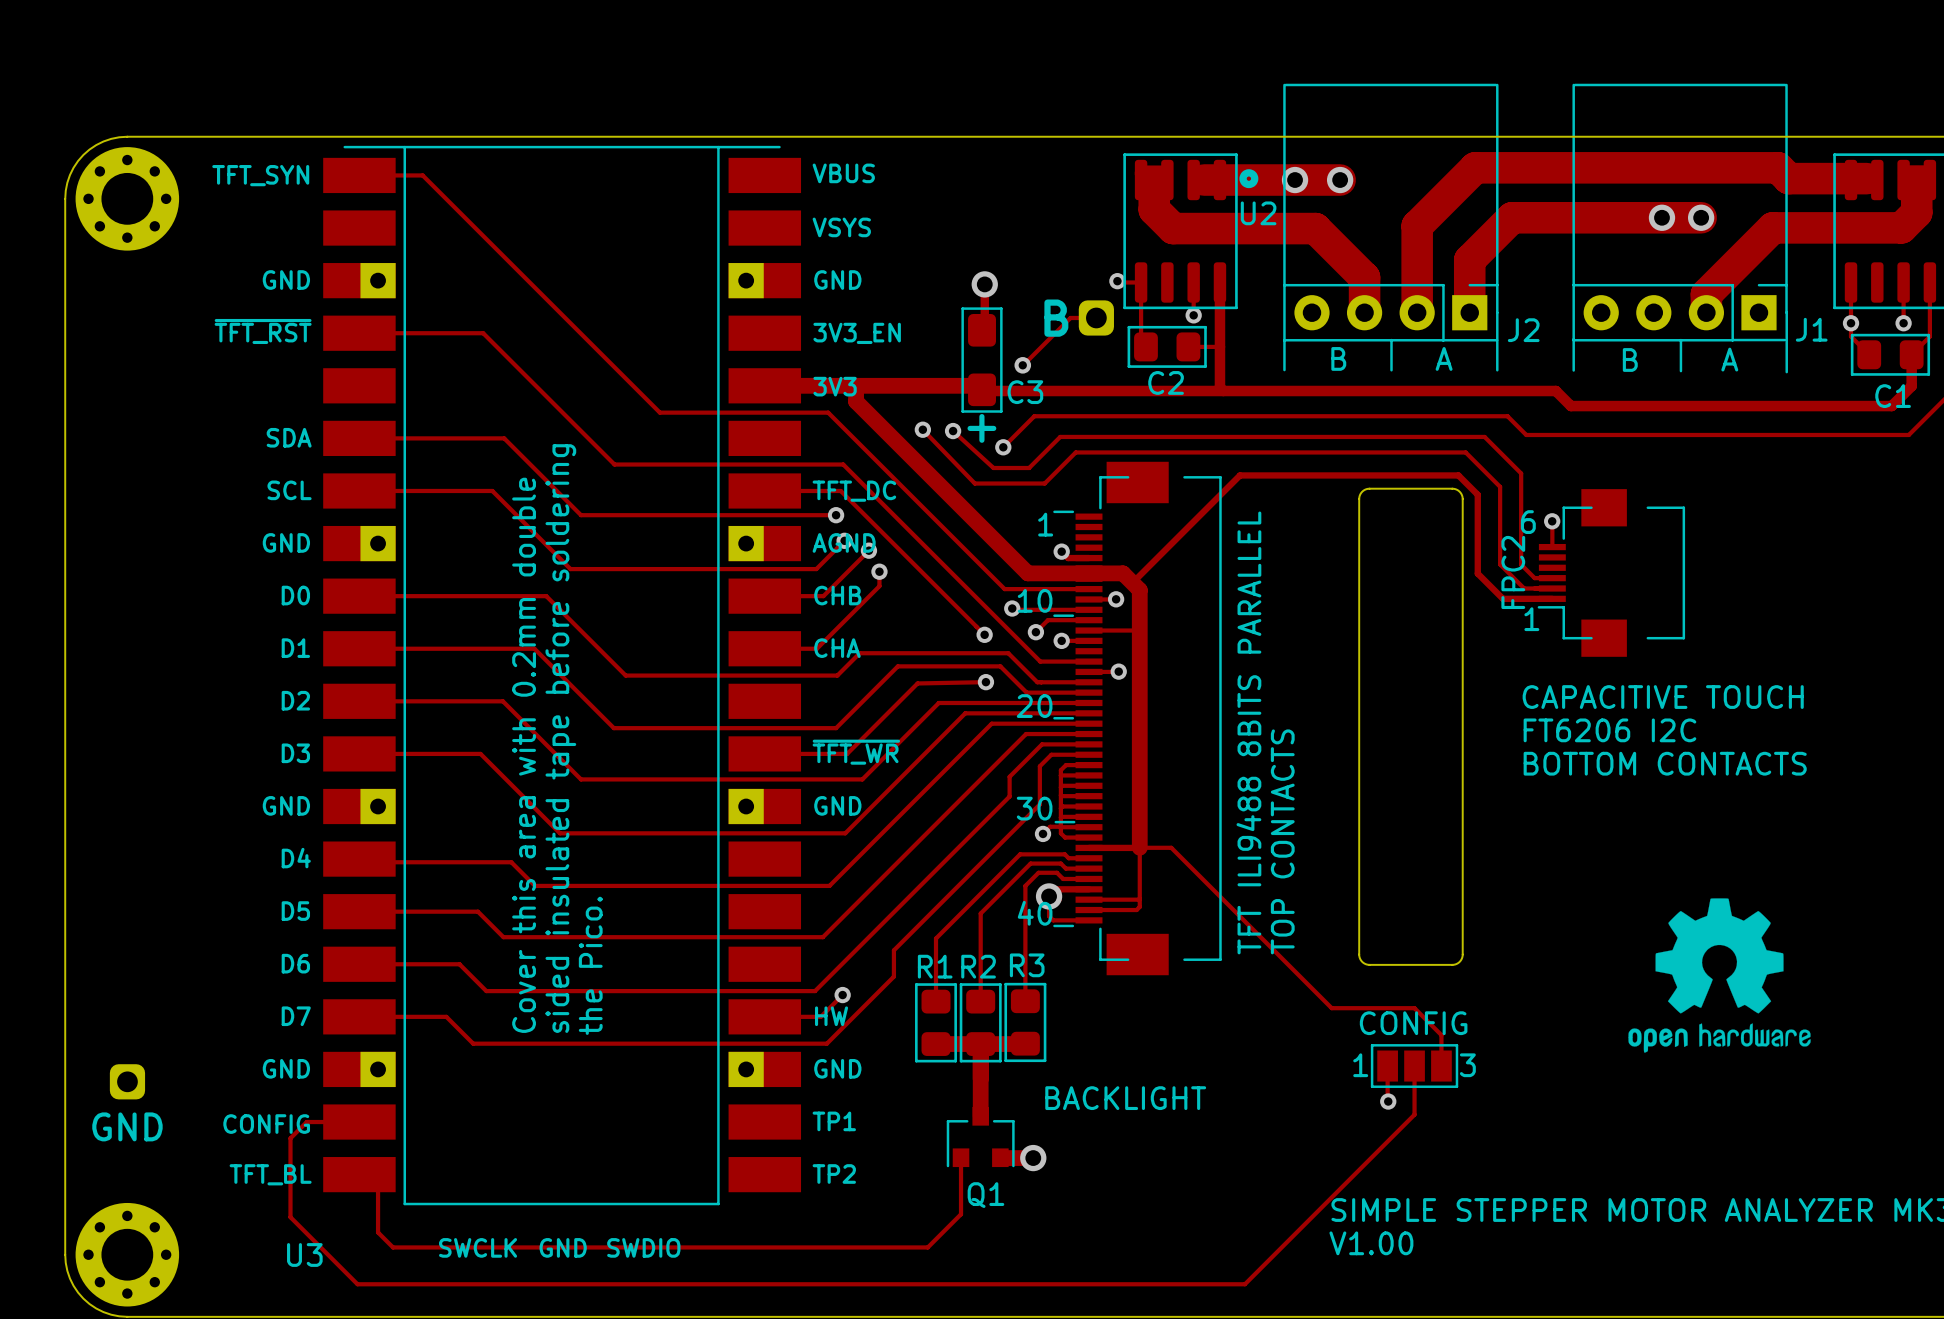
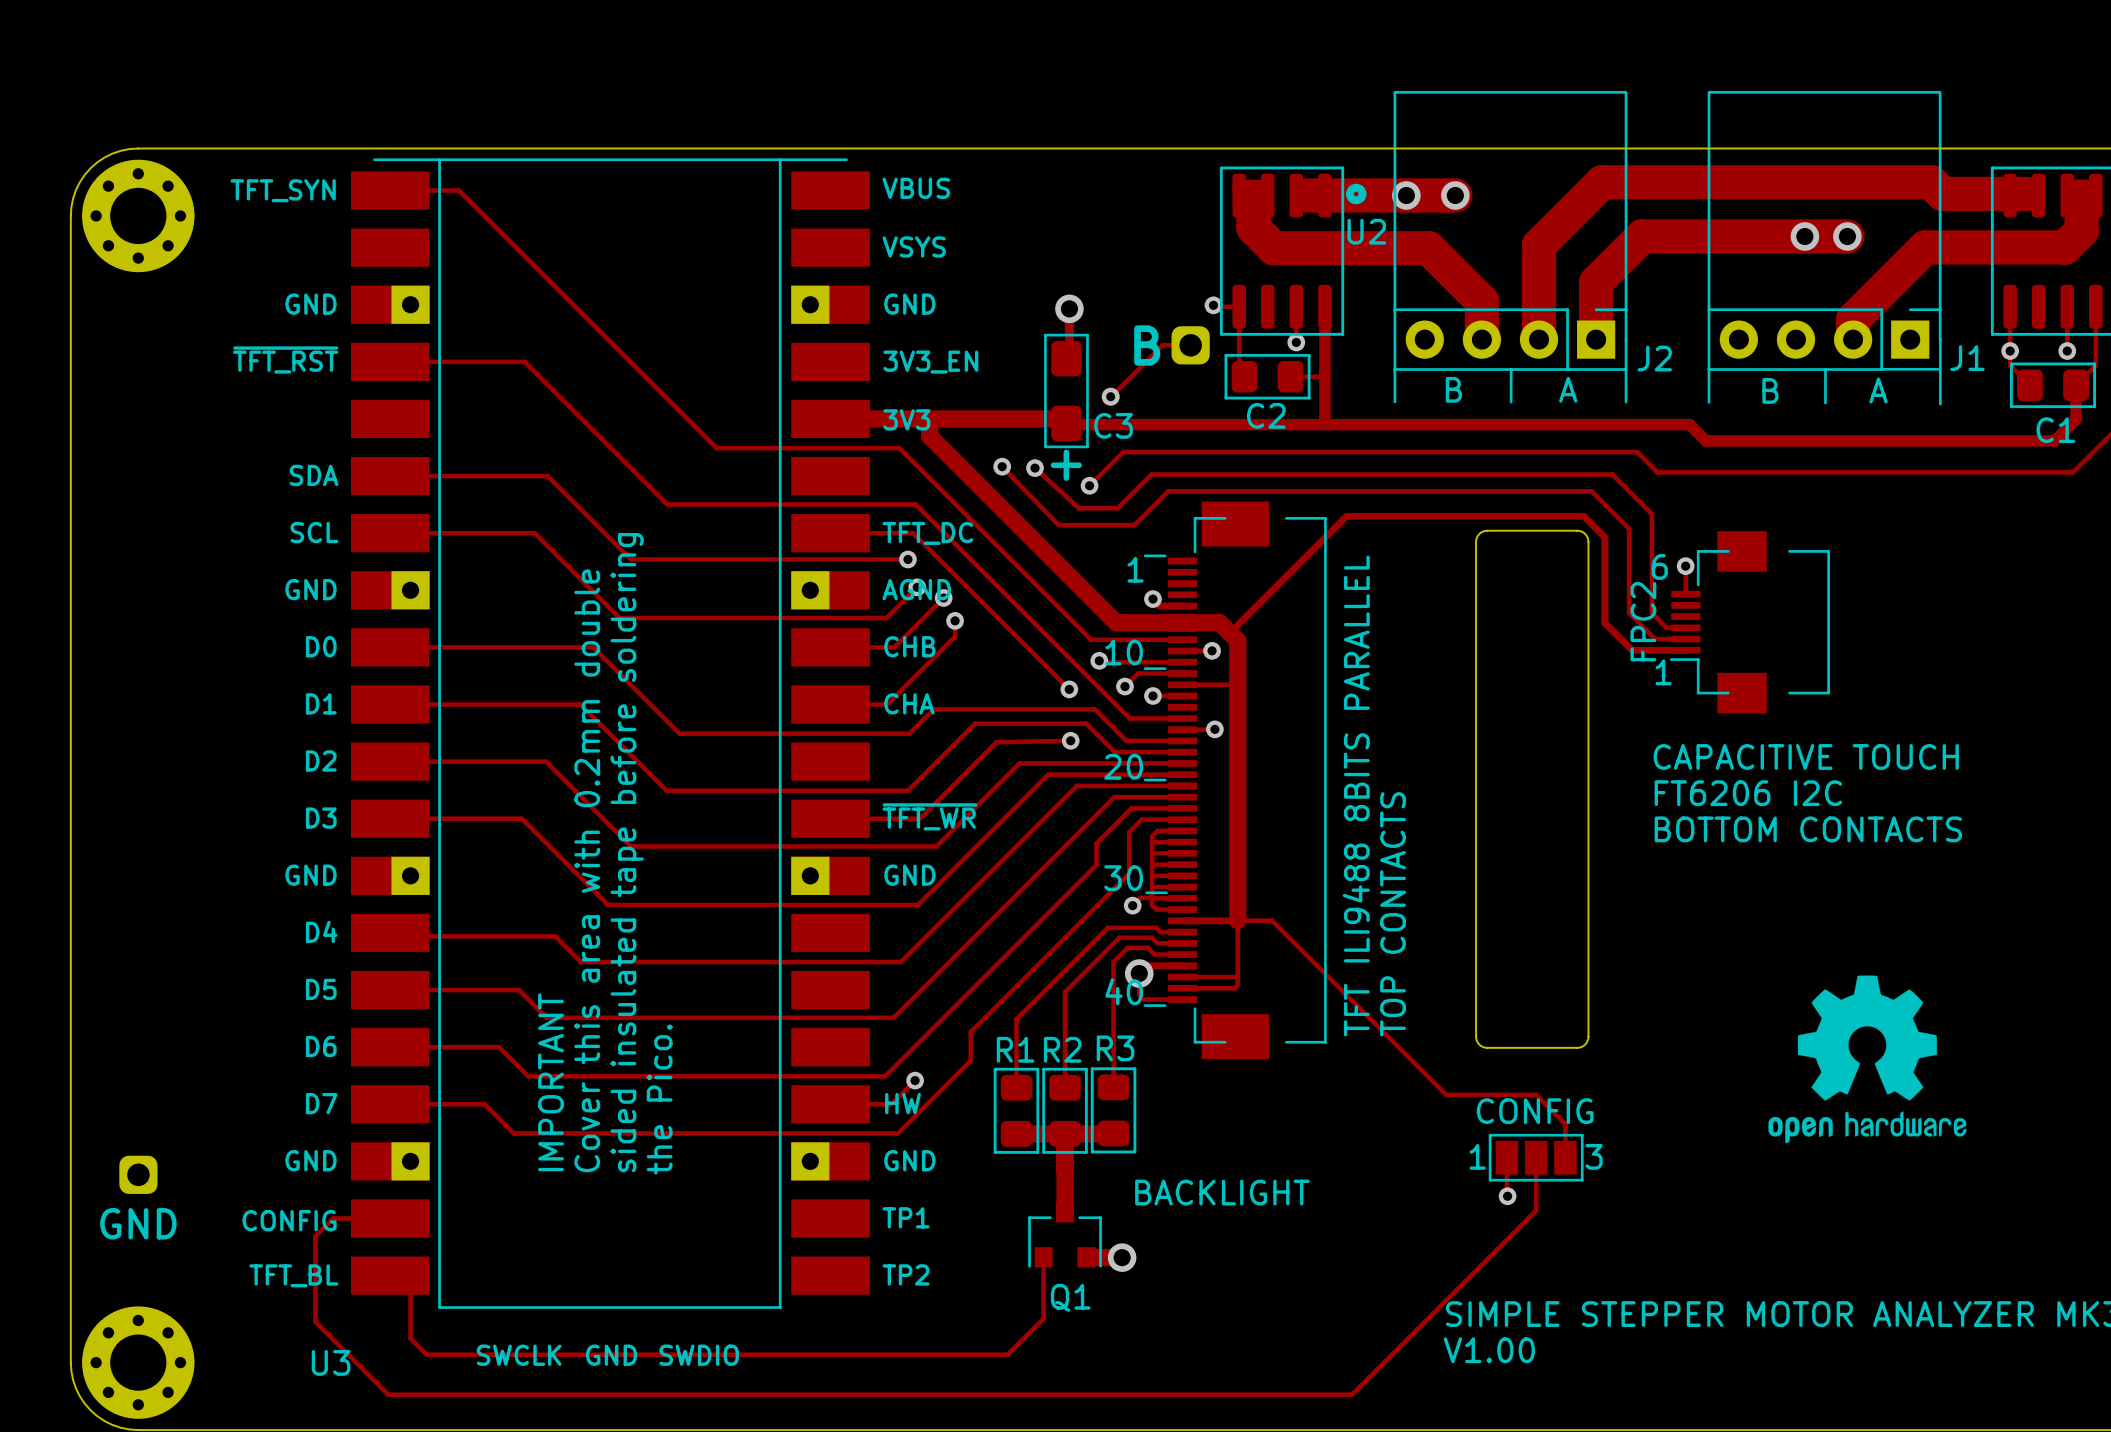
text position: sided insulated tape before soldering (560, 738) -> sided insulated tape before soldering (627, 852)
text position: Cover this area with 0.2mm double (524, 755) -> Cover this area with 0.2mm double (587, 870)
text position: the Pico. (590, 965) -> the Pico. (659, 1099)
text: none -> IMPORTANT (551, 1082)

